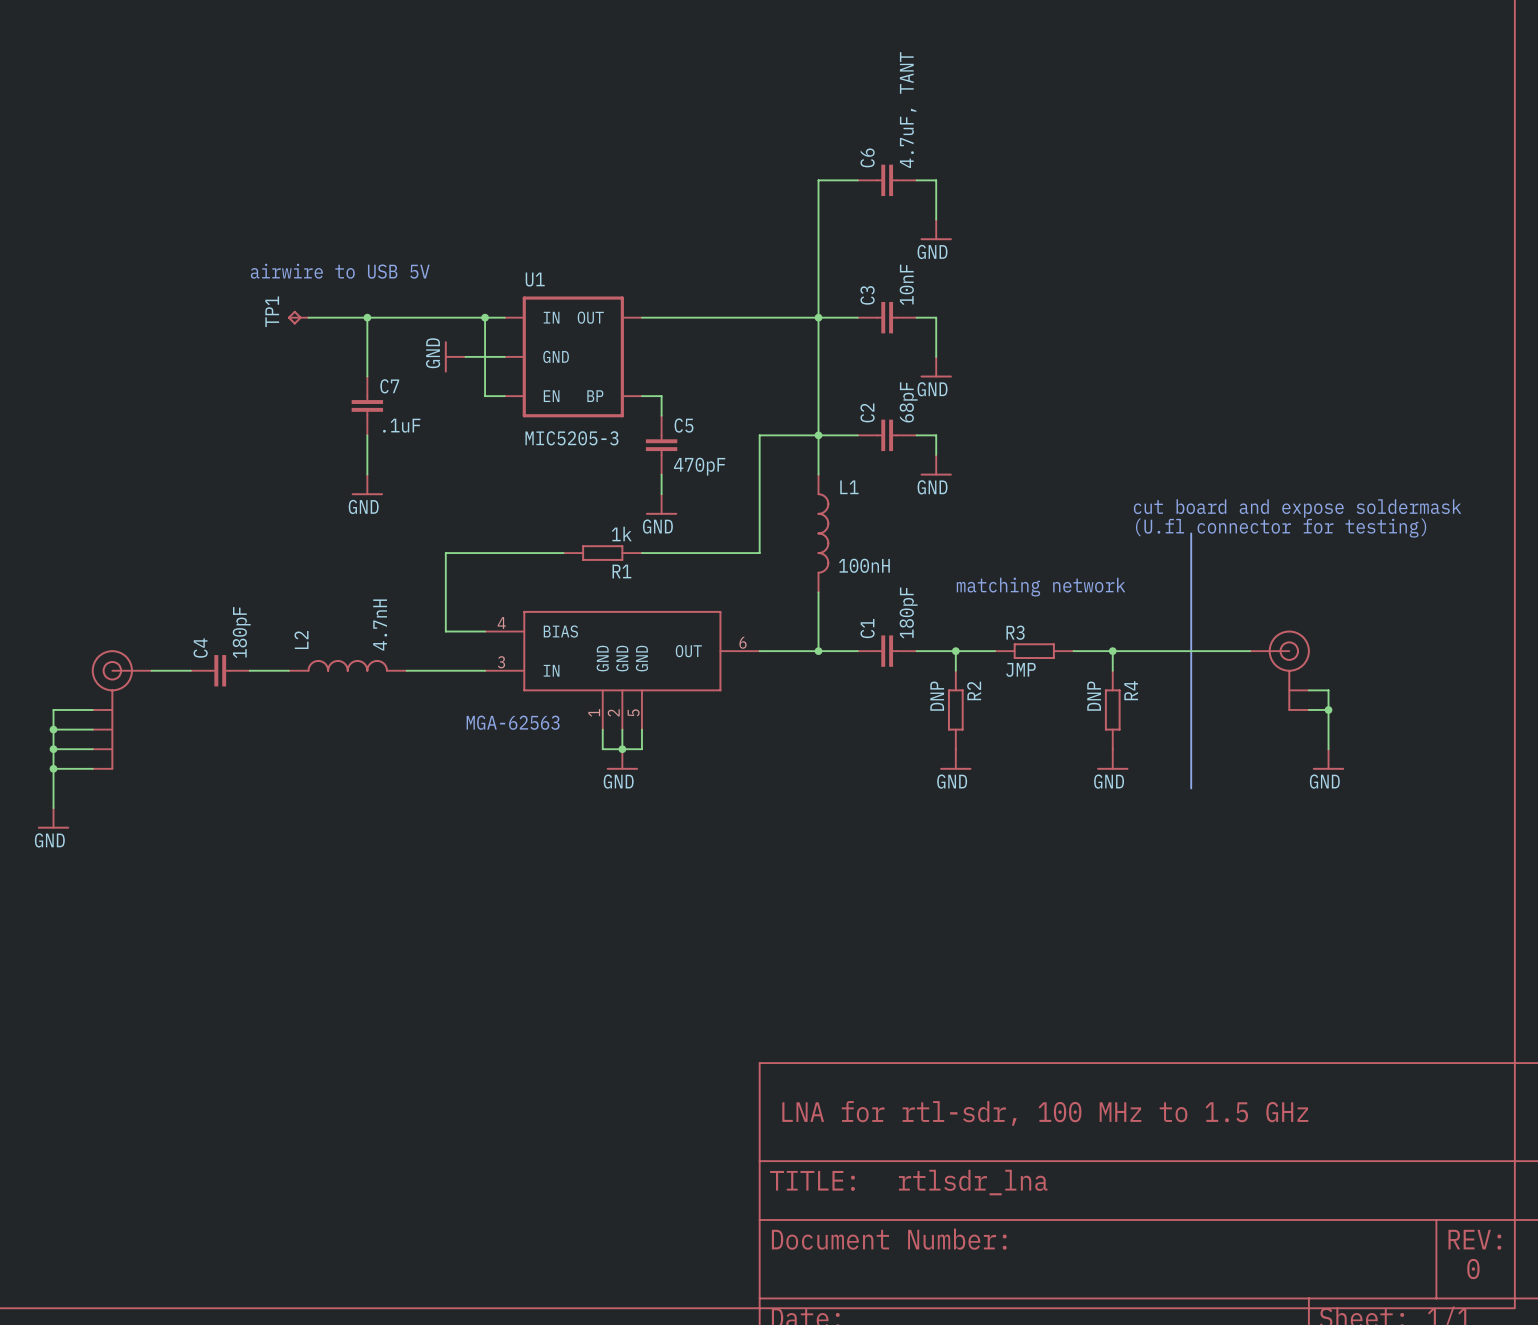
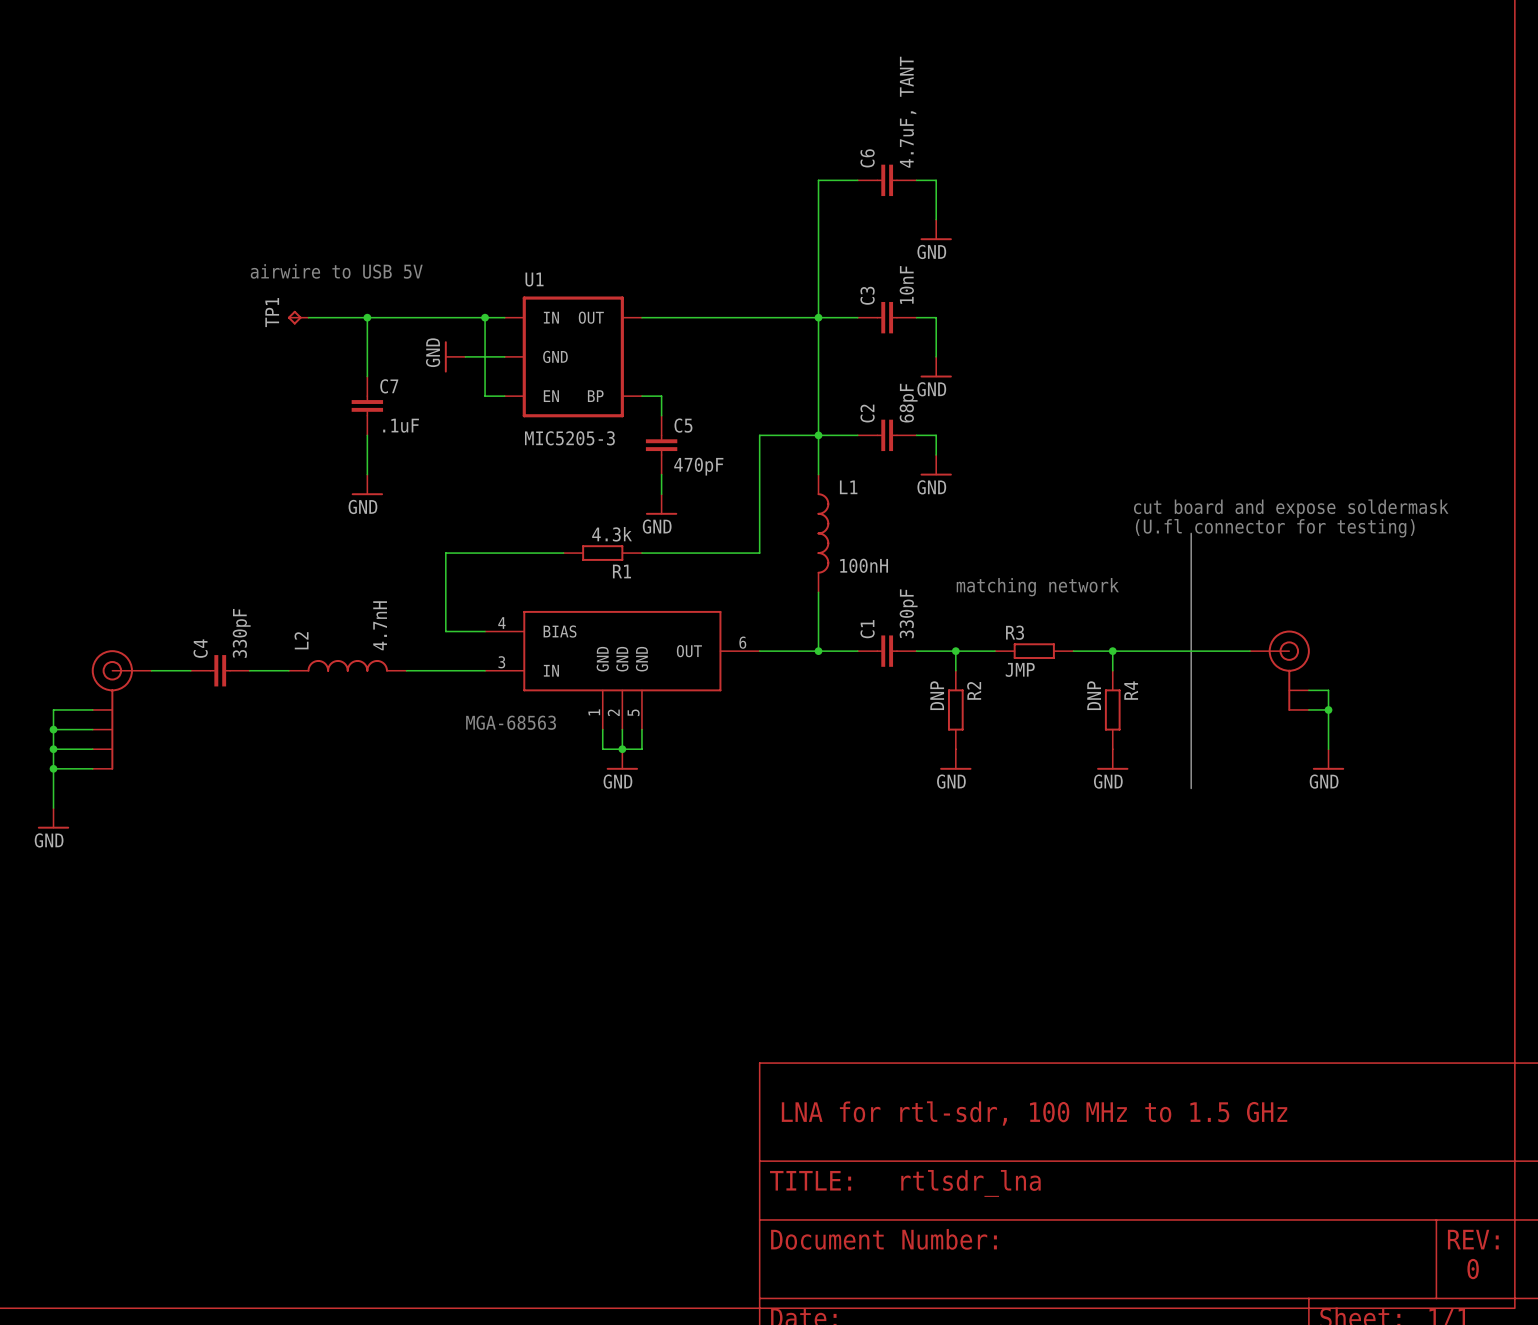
R1 value: 1k (621, 534) -> 4.3k (612, 534)
C1 value: 180pF (908, 612) -> 330pF (908, 613)
C4 value: 180pF (241, 632) -> 330pF (241, 633)
text: MGA-62563 (513, 722) -> MGA-68563 (511, 722)

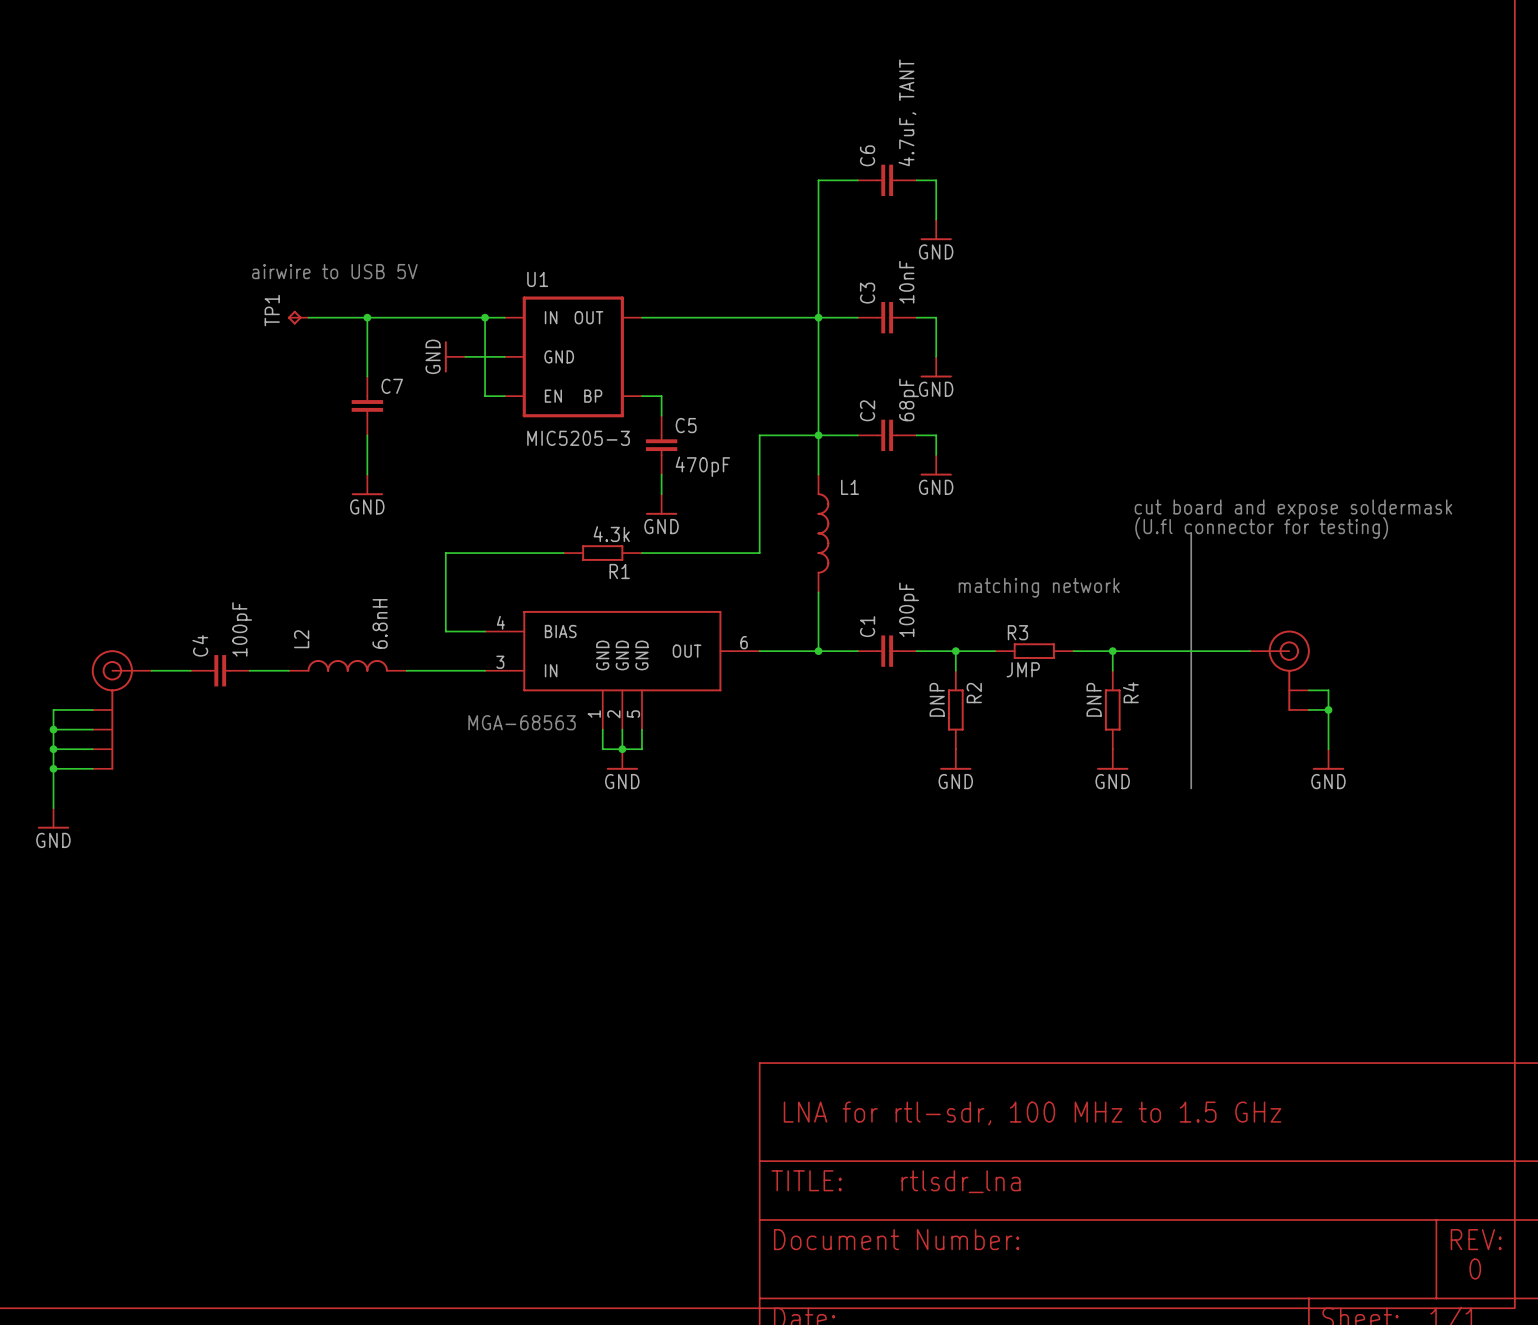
C7 value: .1uF (401, 425) -> none
L1 value: 100nH (864, 565) -> none
C1 value: 330pF (908, 613) -> 100pF (909, 609)
L2 value: 4.7nH (380, 625) -> 6.8nH (380, 623)
C4 value: 330pF (241, 633) -> 100pF (242, 629)

